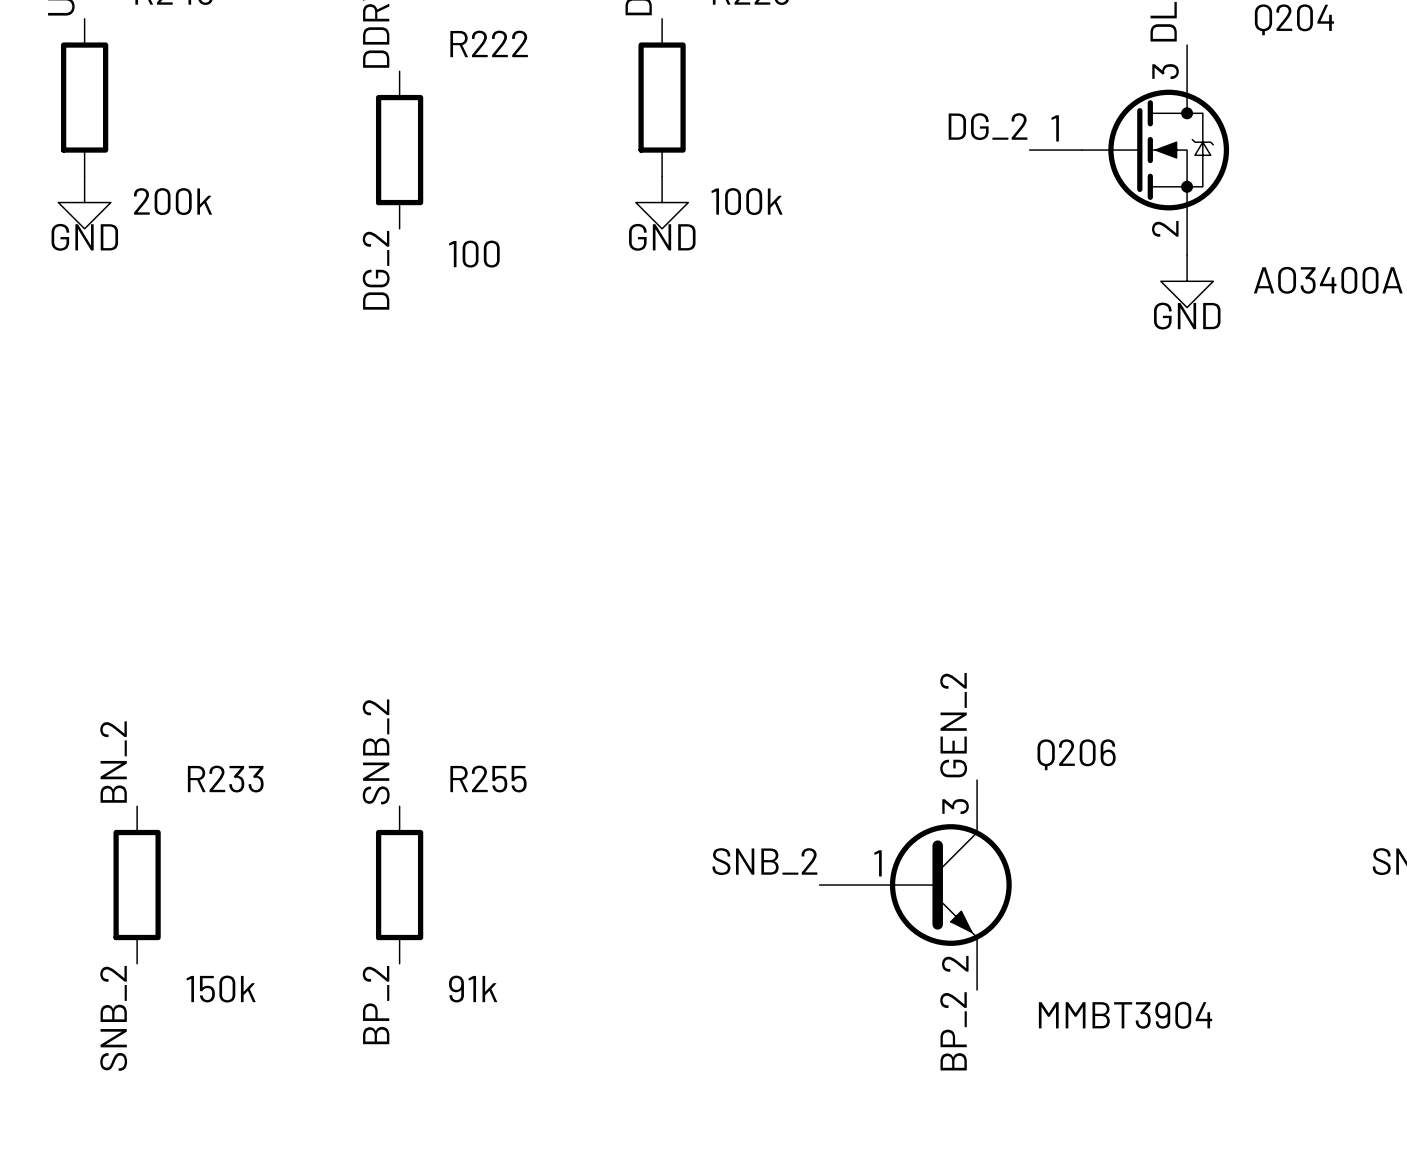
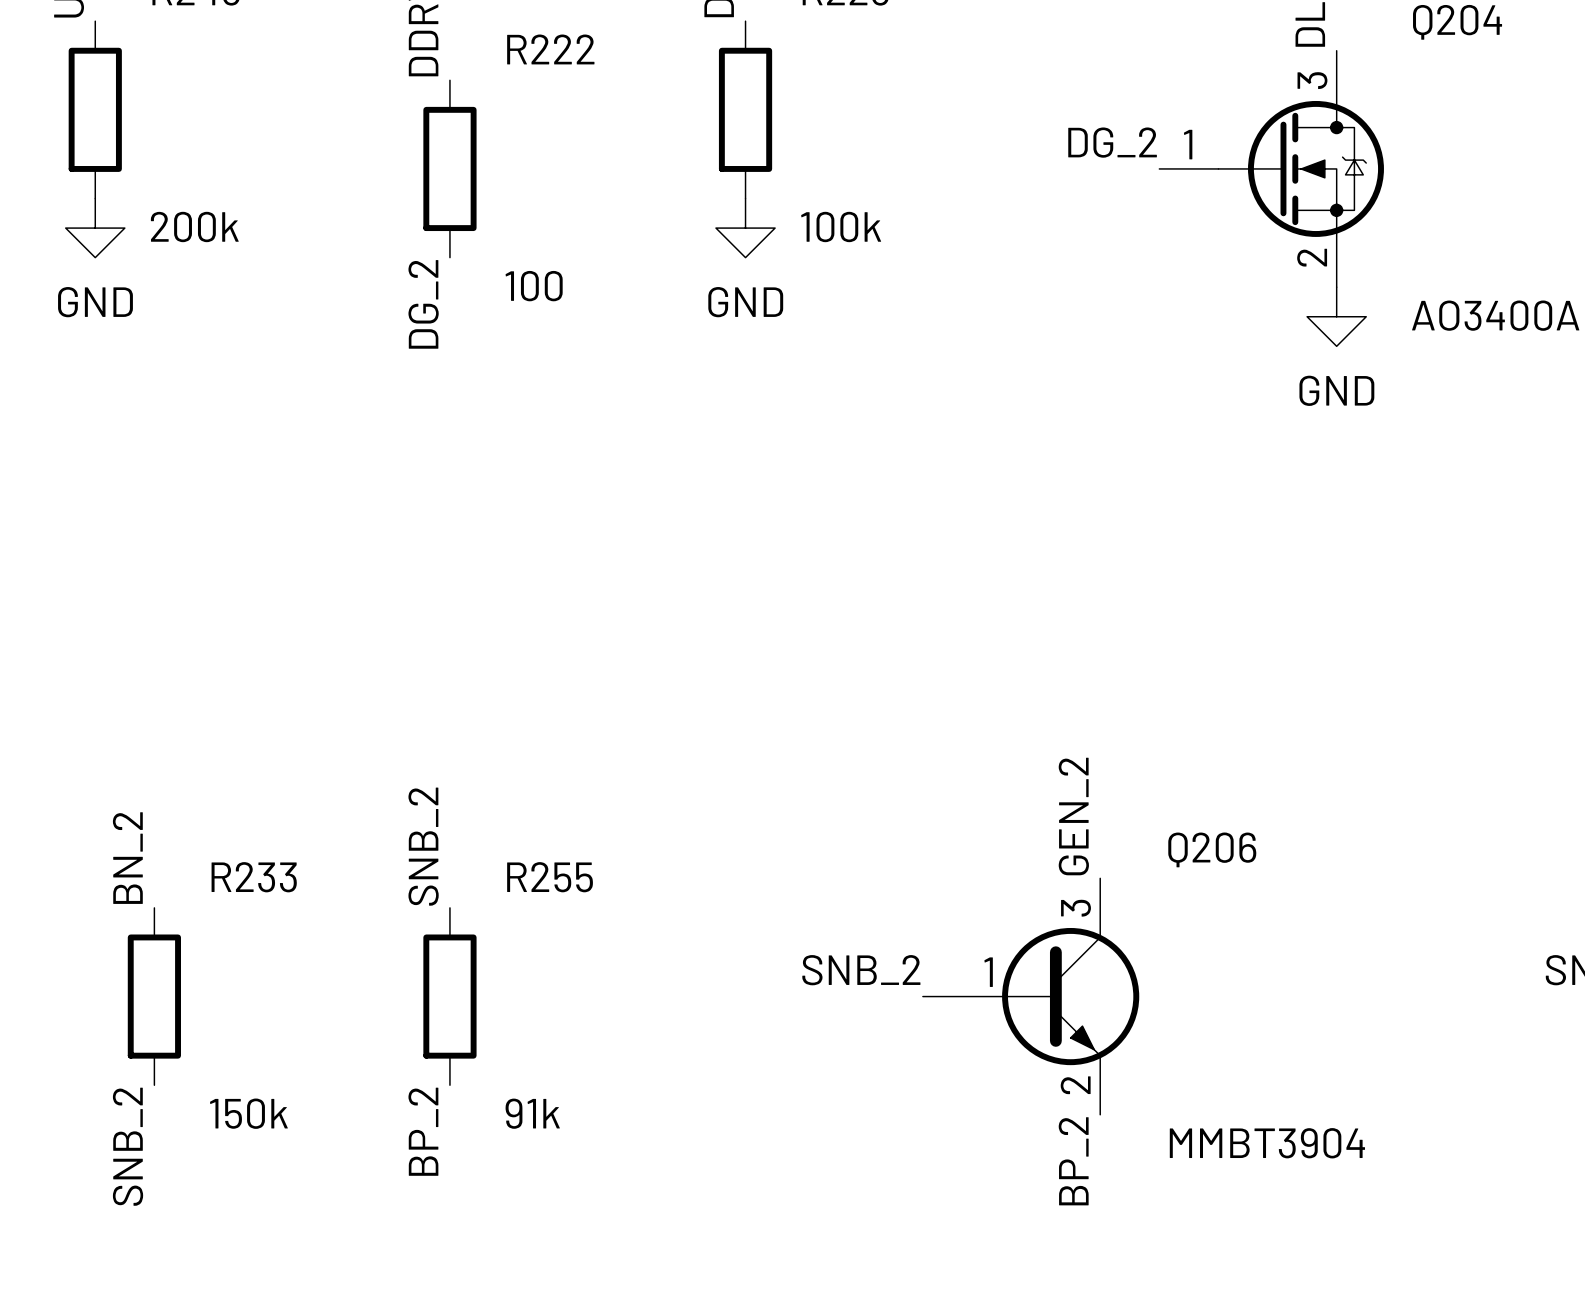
power symbol text position: GND (84, 237) -> GND (95, 302)
power symbol text position: GND (662, 237) -> GND (745, 302)
power symbol text position: GND (1187, 316) -> GND (1336, 390)

